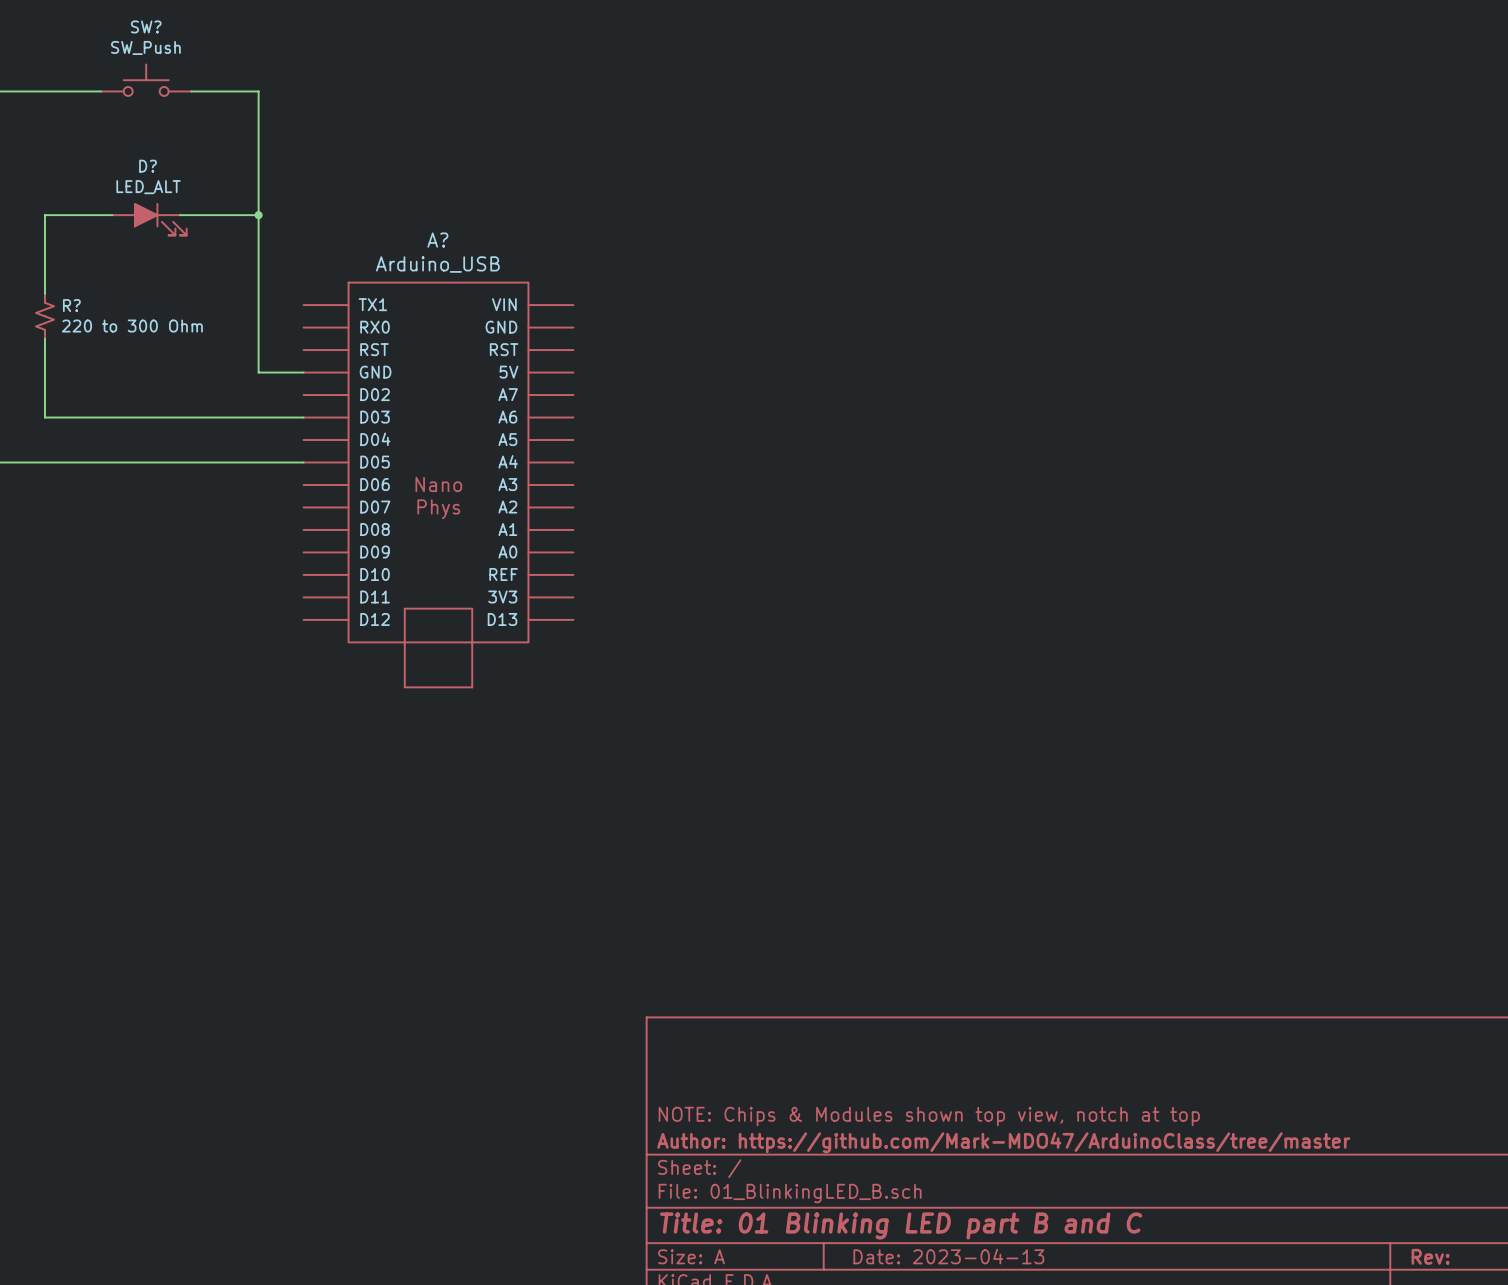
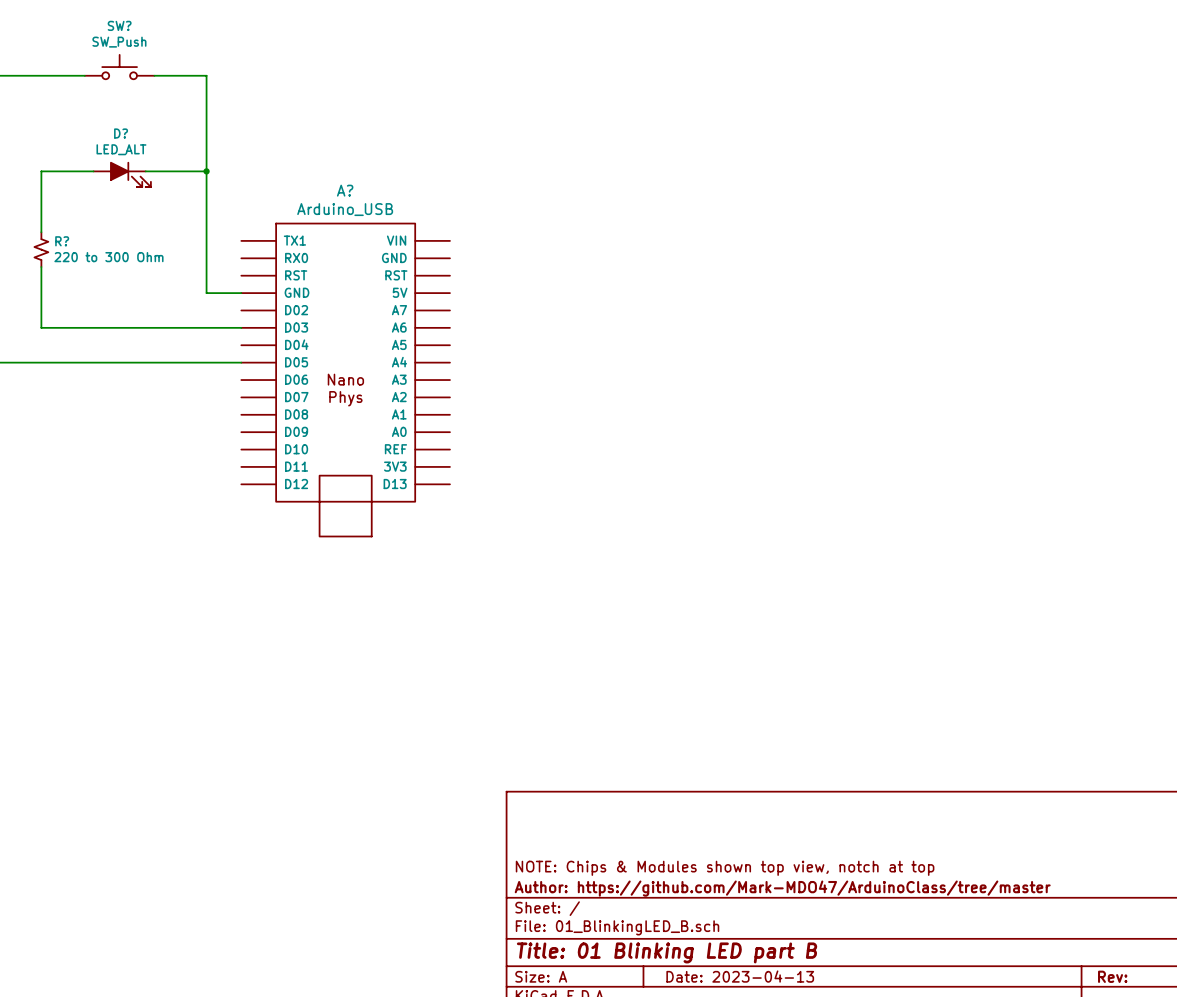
title block: Title: 01 Blinking LED part B and C (901, 1225) -> Title: 01 Blinking LED part B (667, 952)

